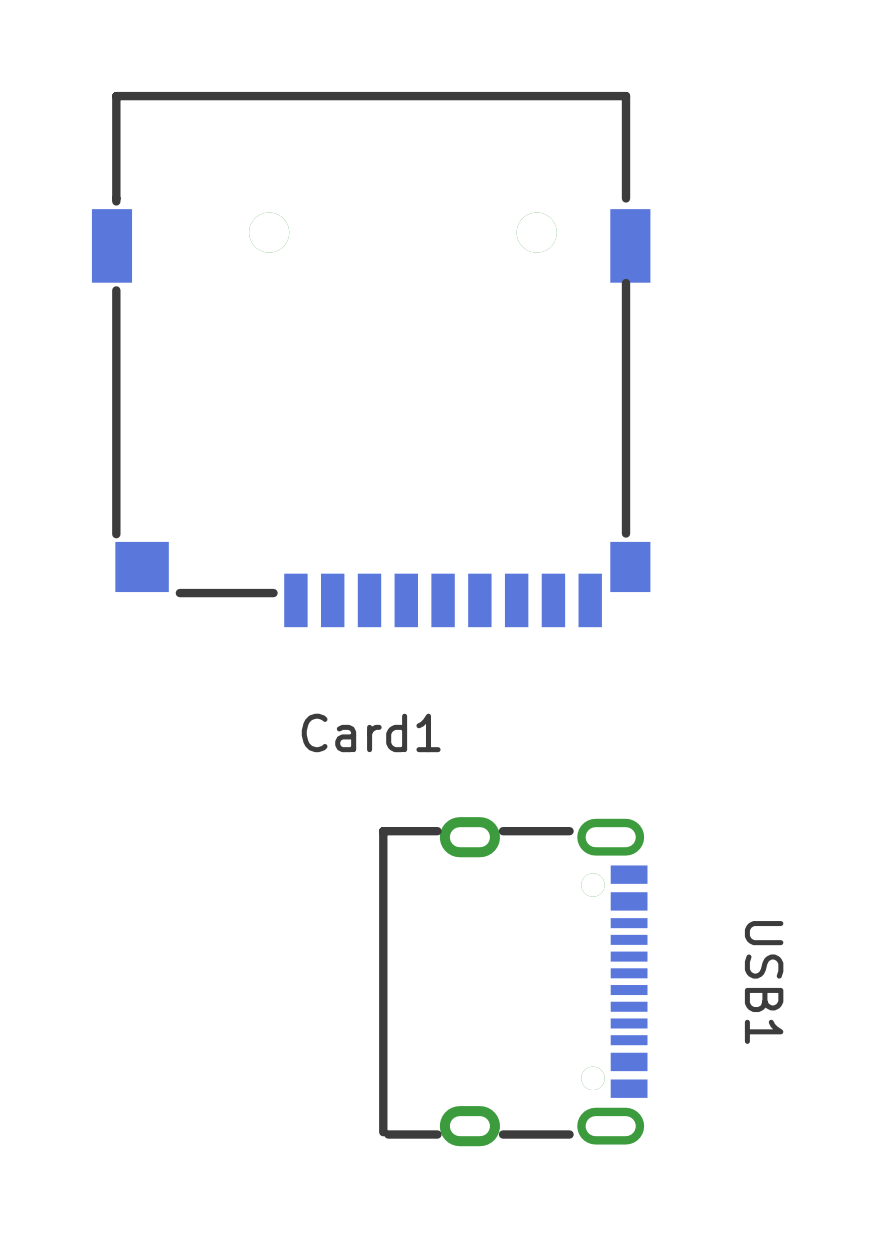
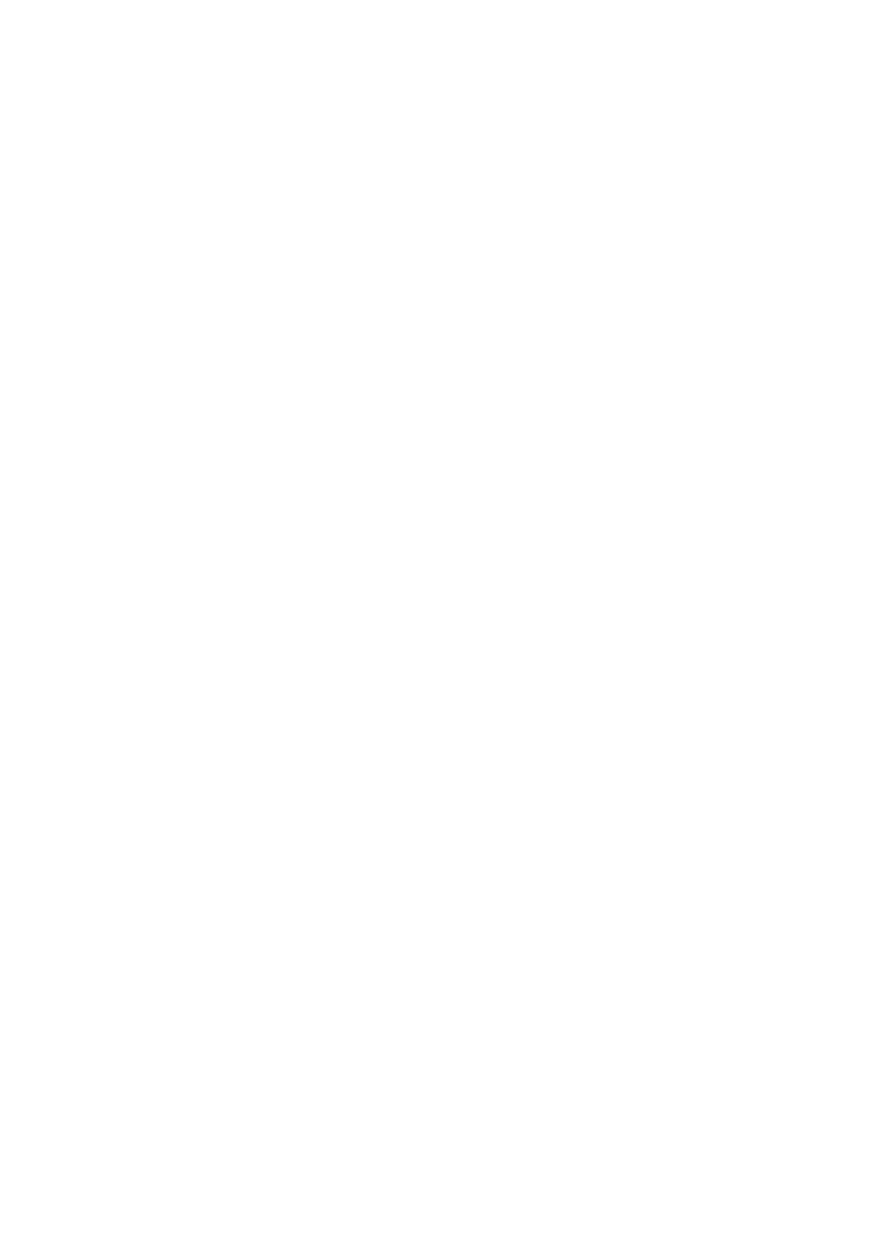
Card1: (371, 359) -> none
USB1: (513, 981) -> none

